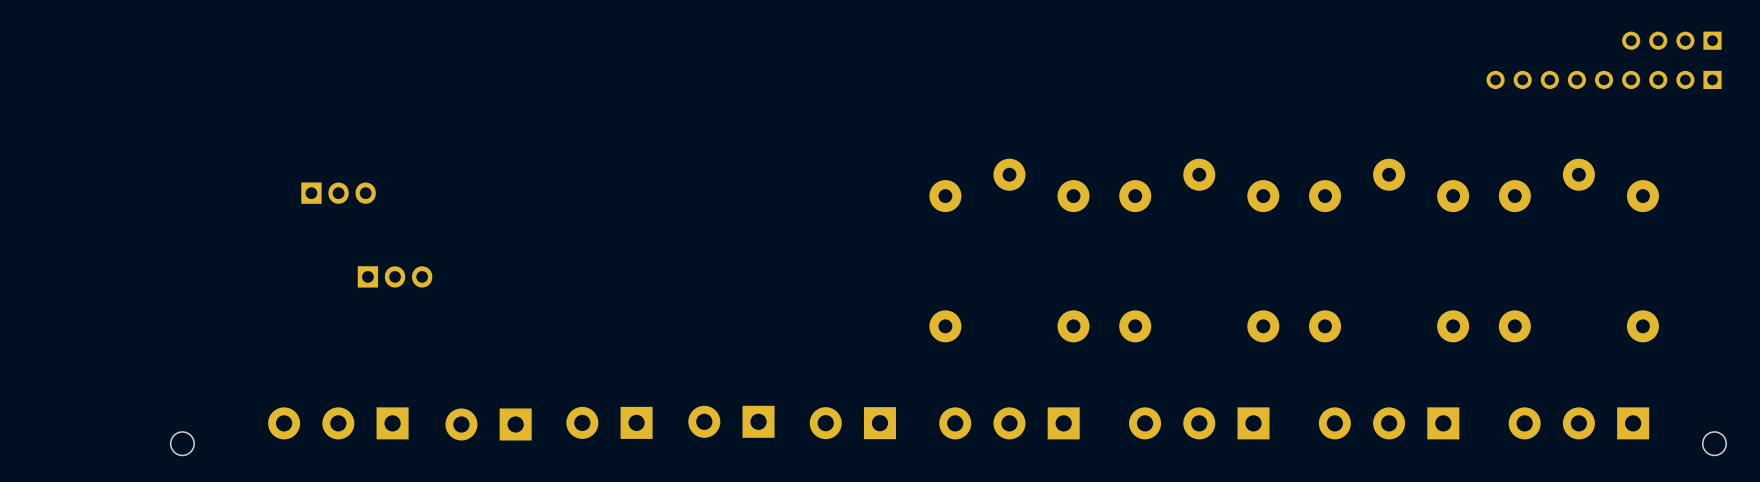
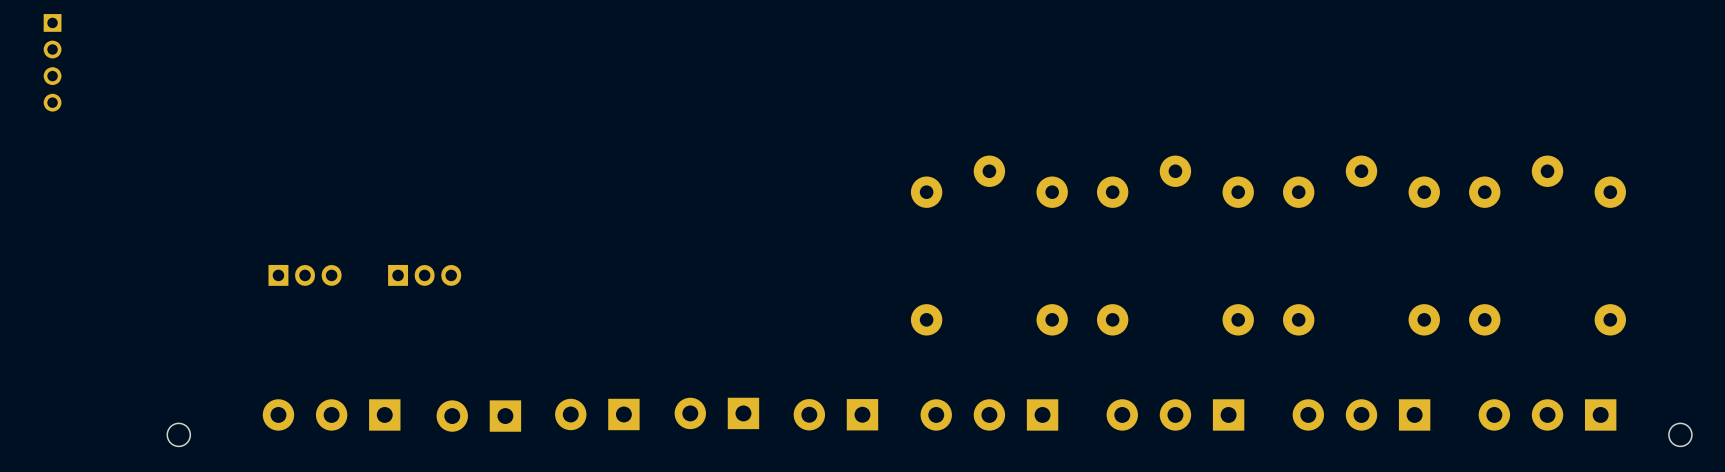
part: (1671, 40) -> none
part: none -> (52, 62)
part: (1604, 79) -> none
part: (338, 193) -> none
part position: (395, 276) -> (424, 275)
part: none -> (305, 275)

